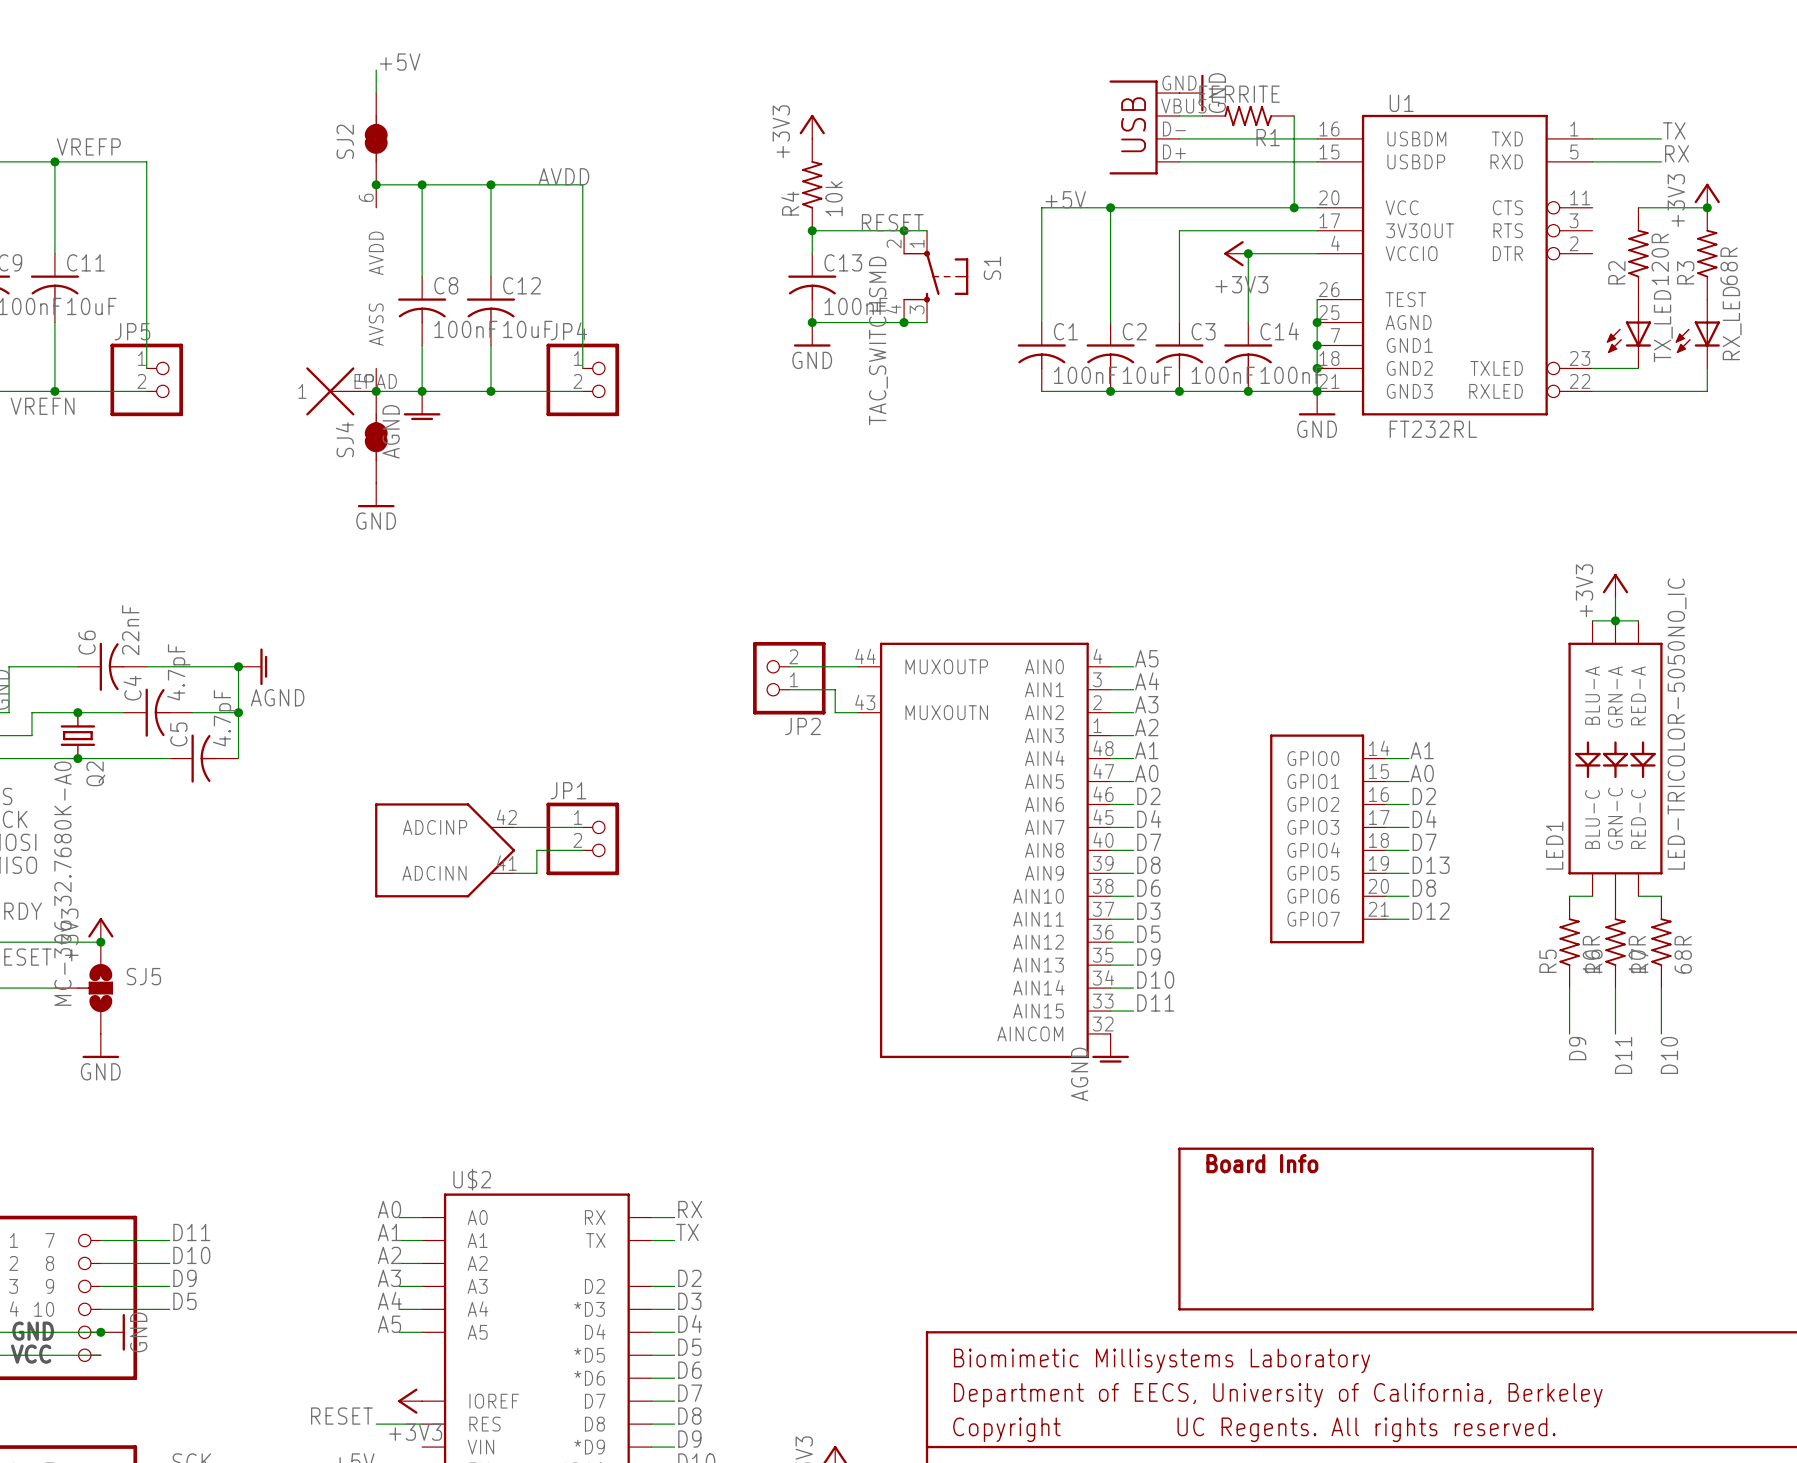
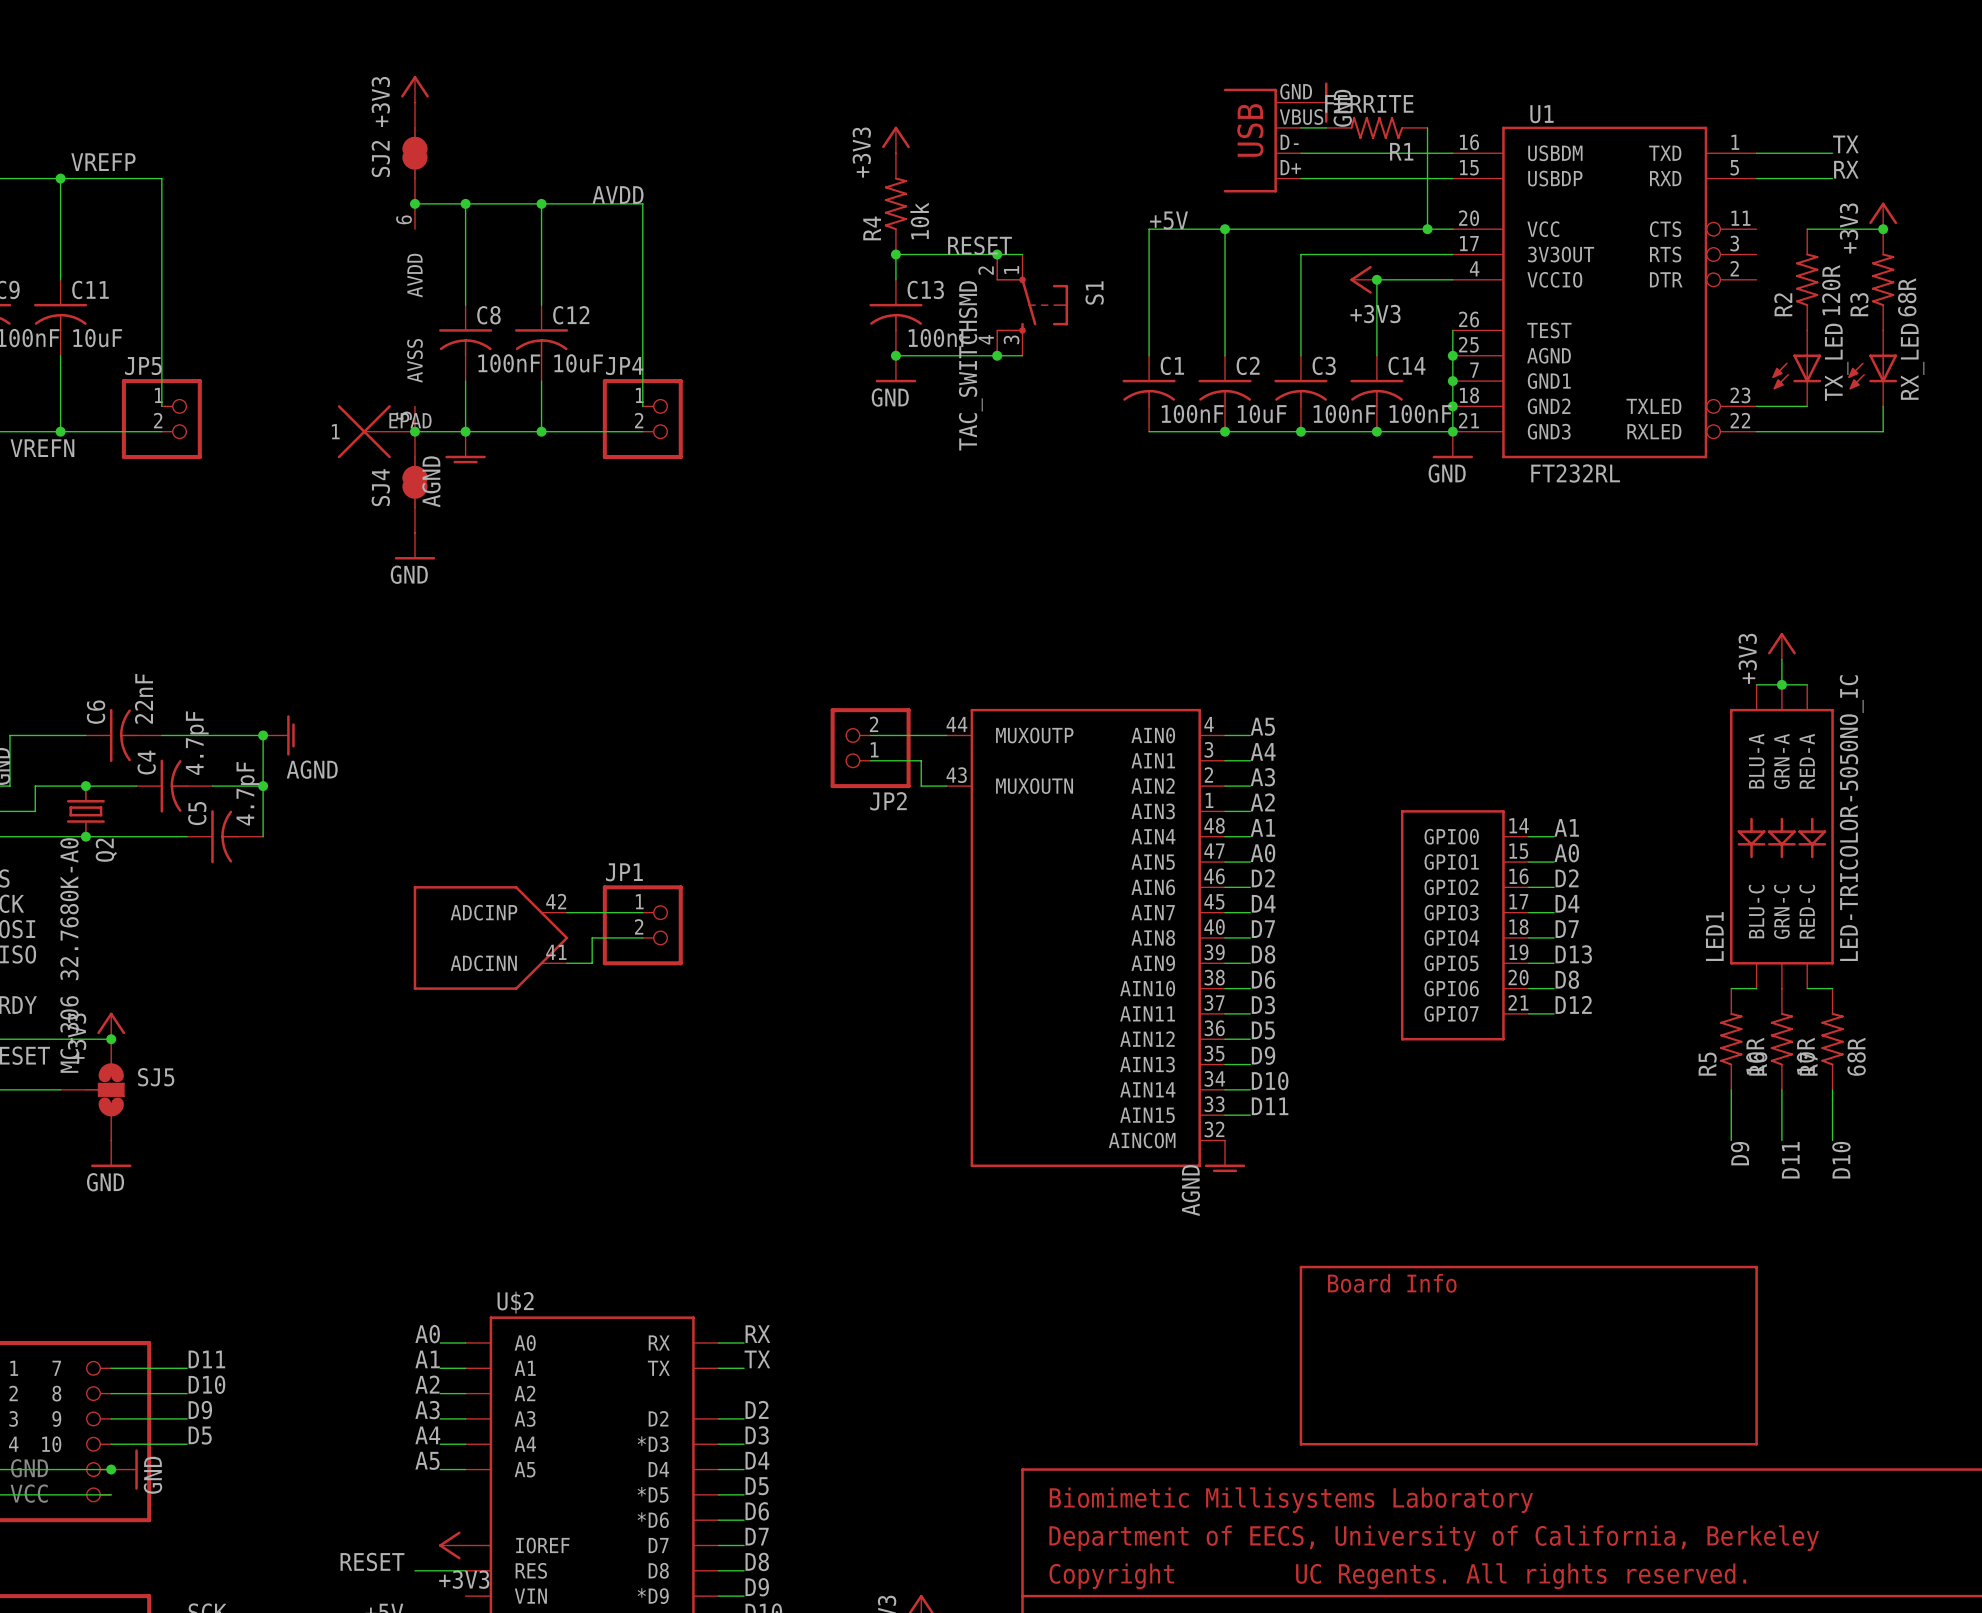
label: +5V (400, 62) -> none
power symbol: none -> +3V3 (414, 89)

